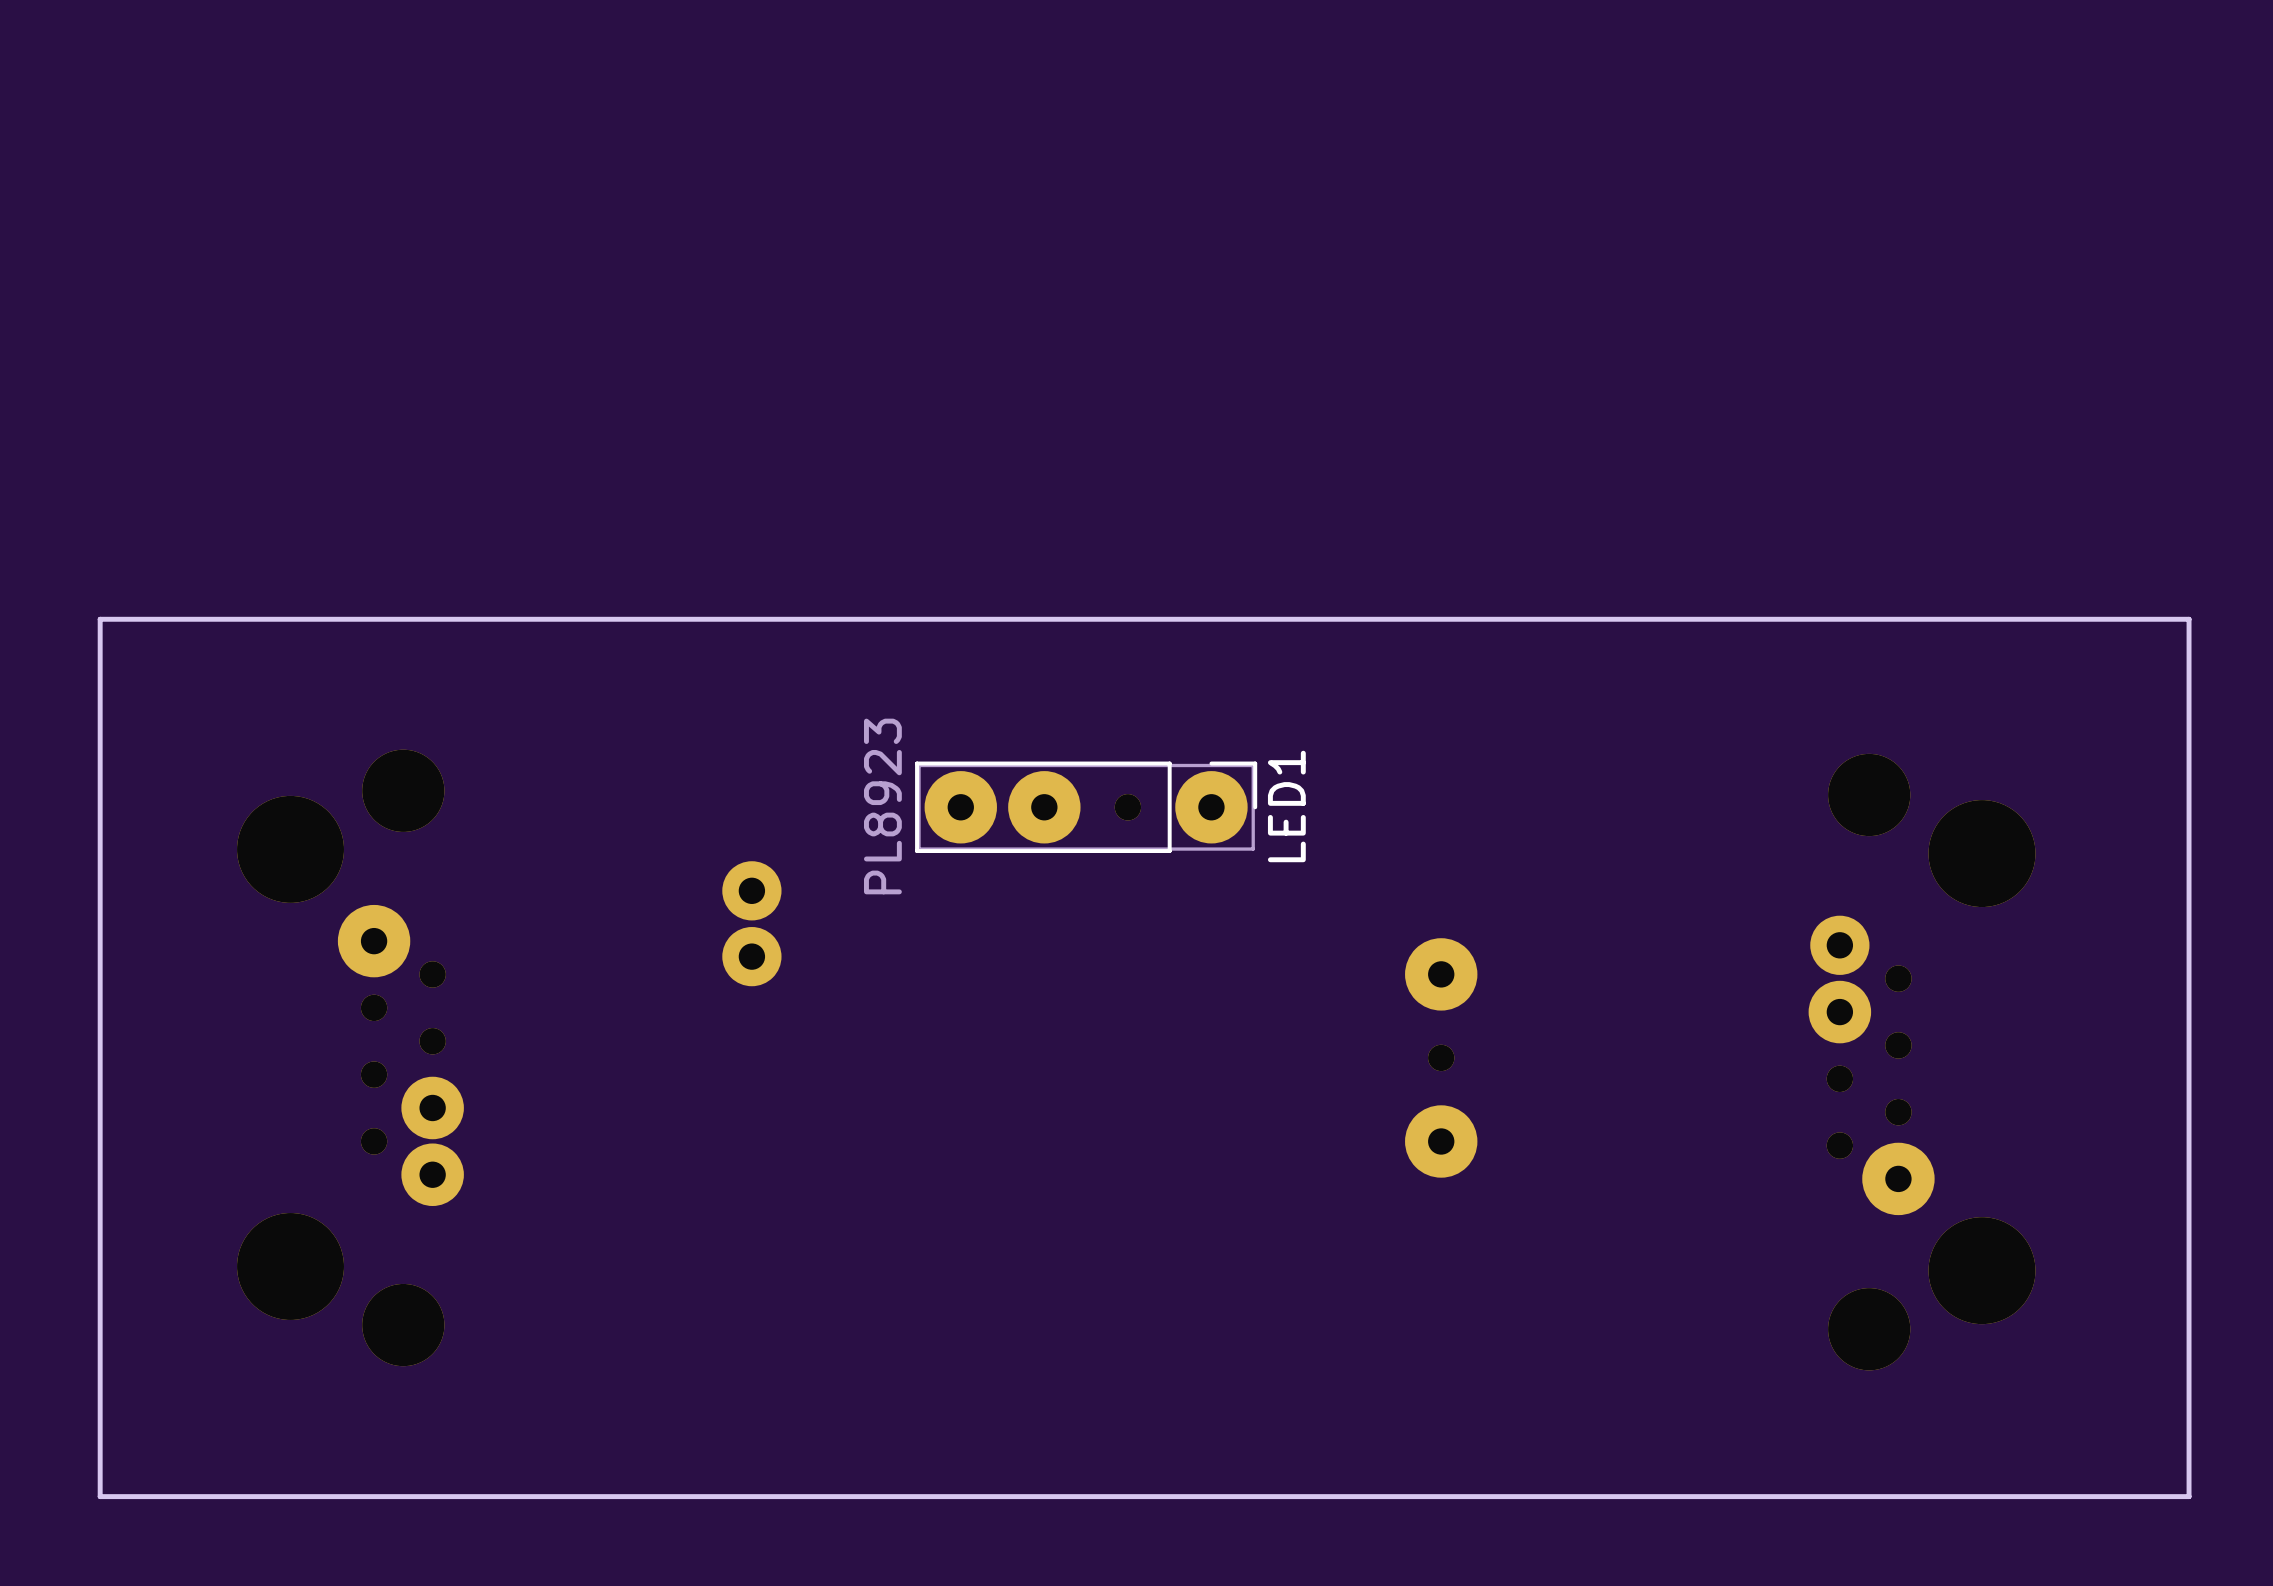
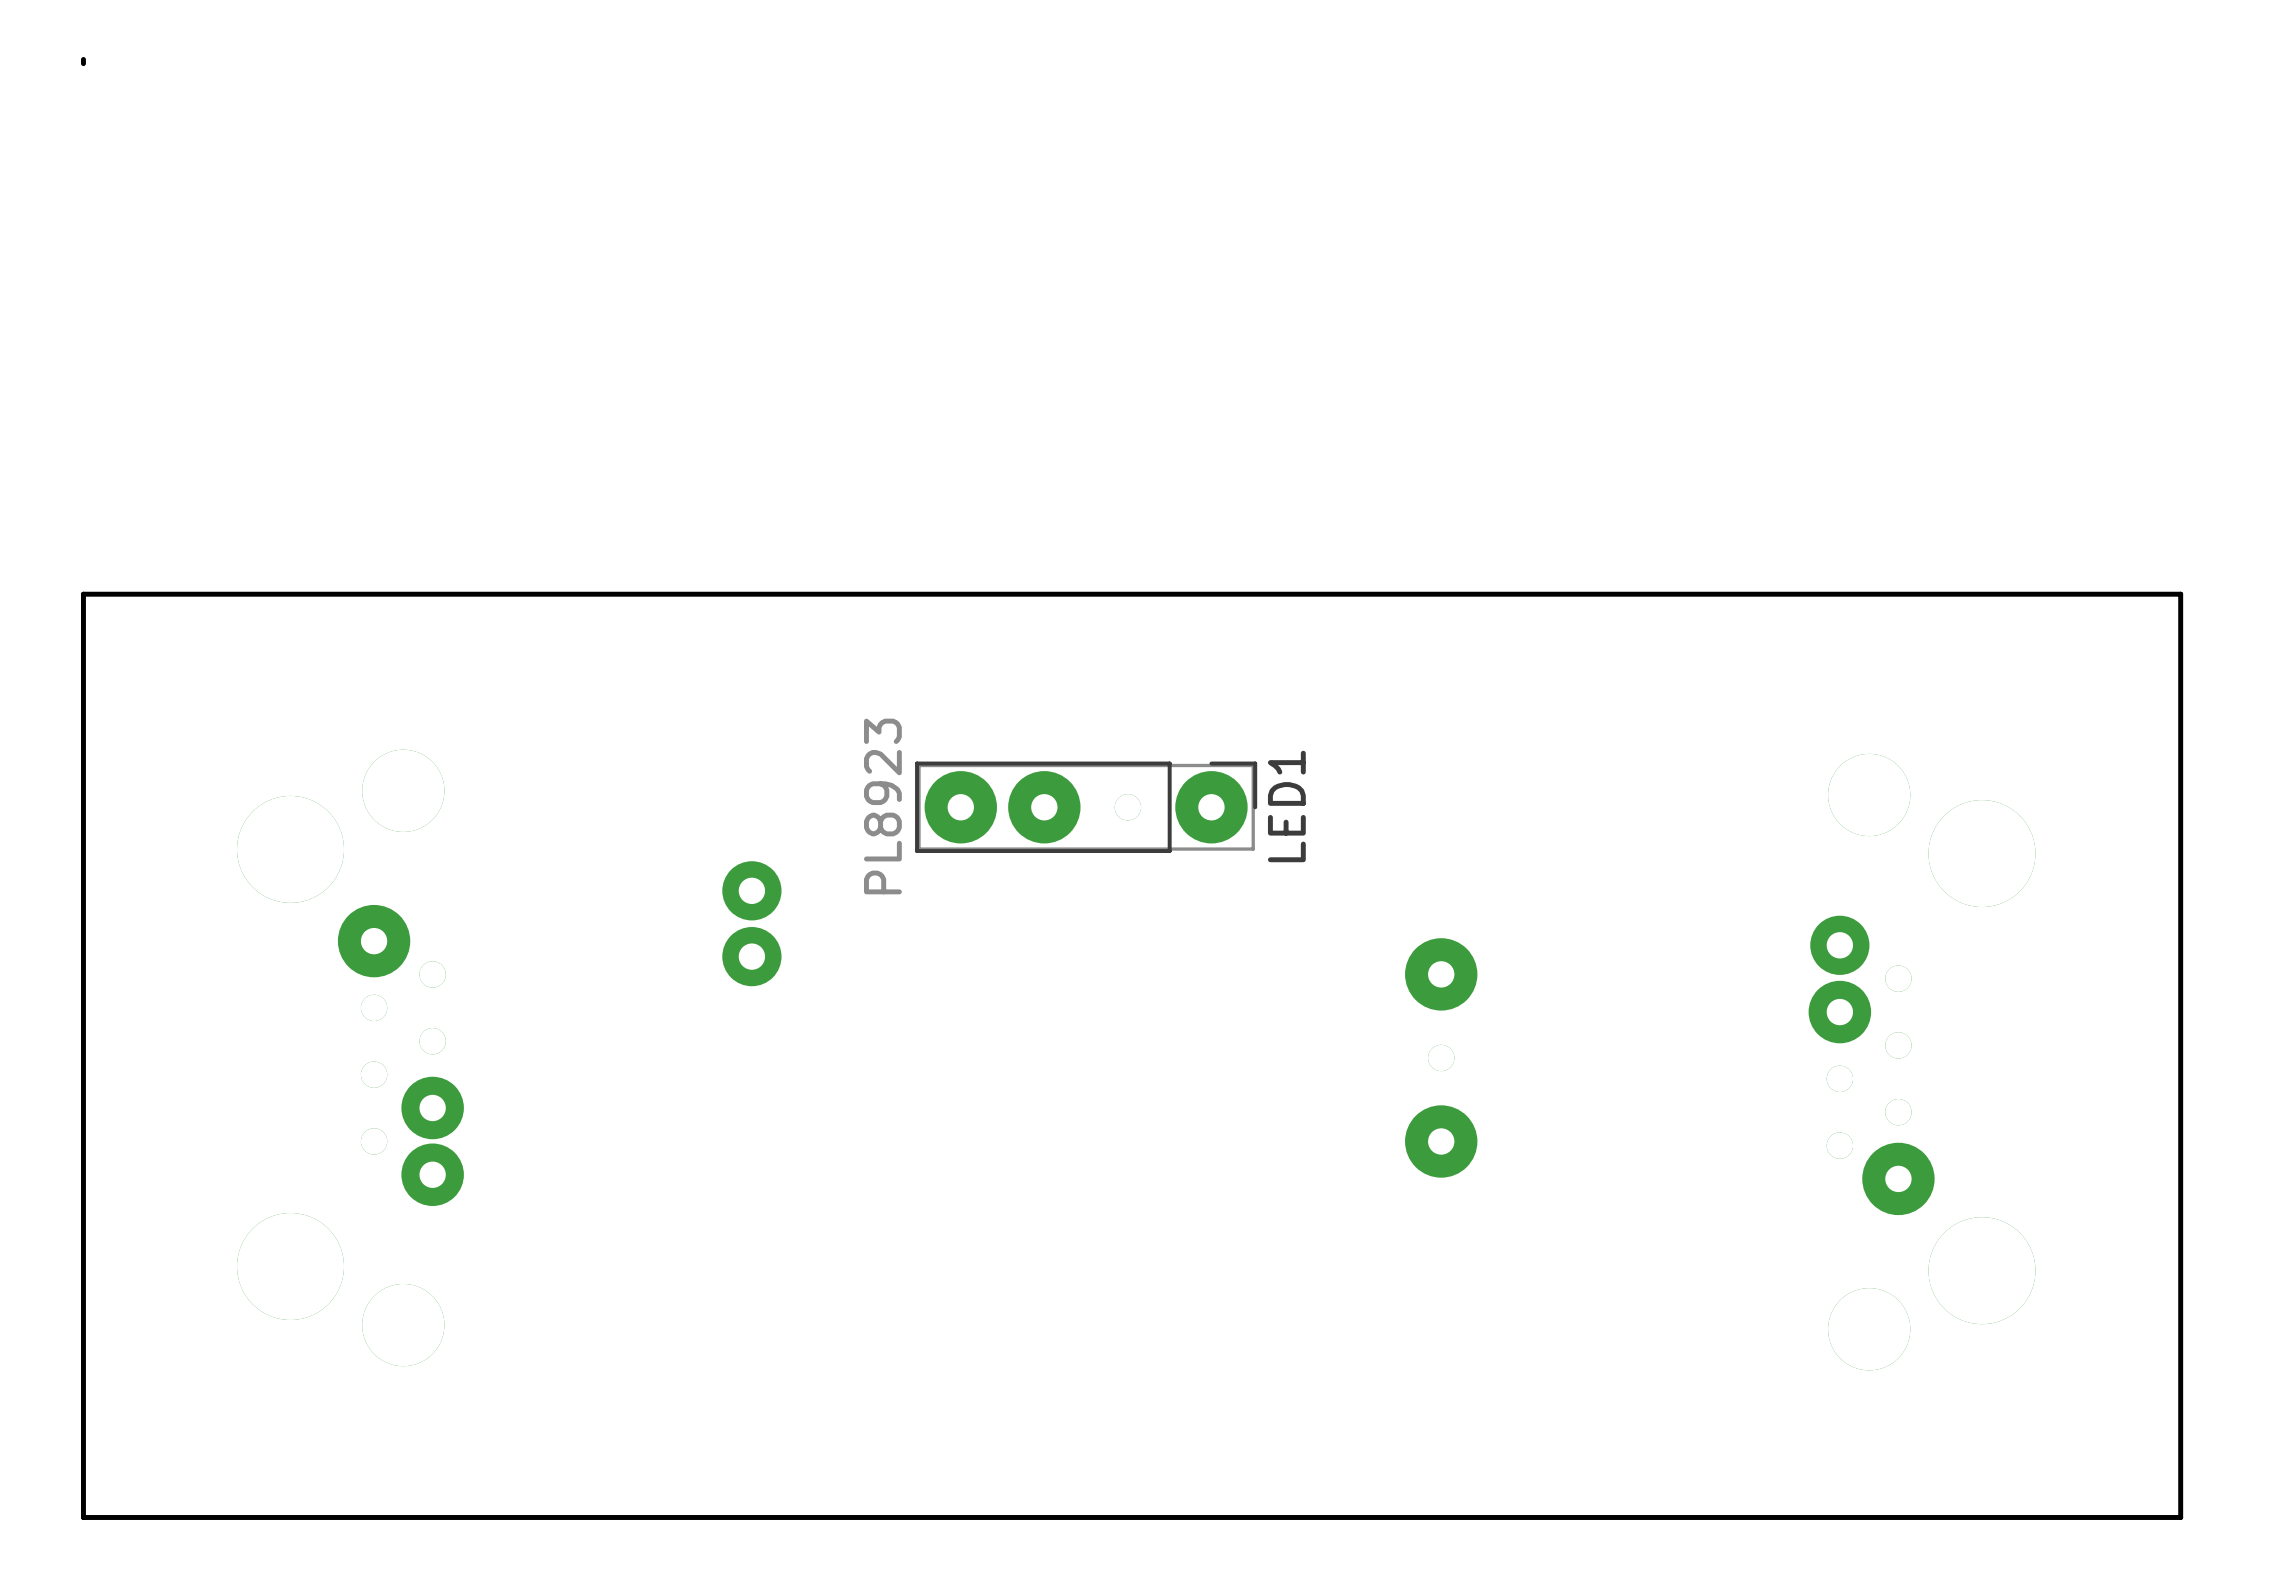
board edge: none -> (83, 59) (83, 63)
board edge: (100, 619) (100, 1496) (2189, 1496) (2189, 619) (100, 619) -> (83, 594) (83, 1517) (2180, 1517) (2180, 594) (83, 594)

